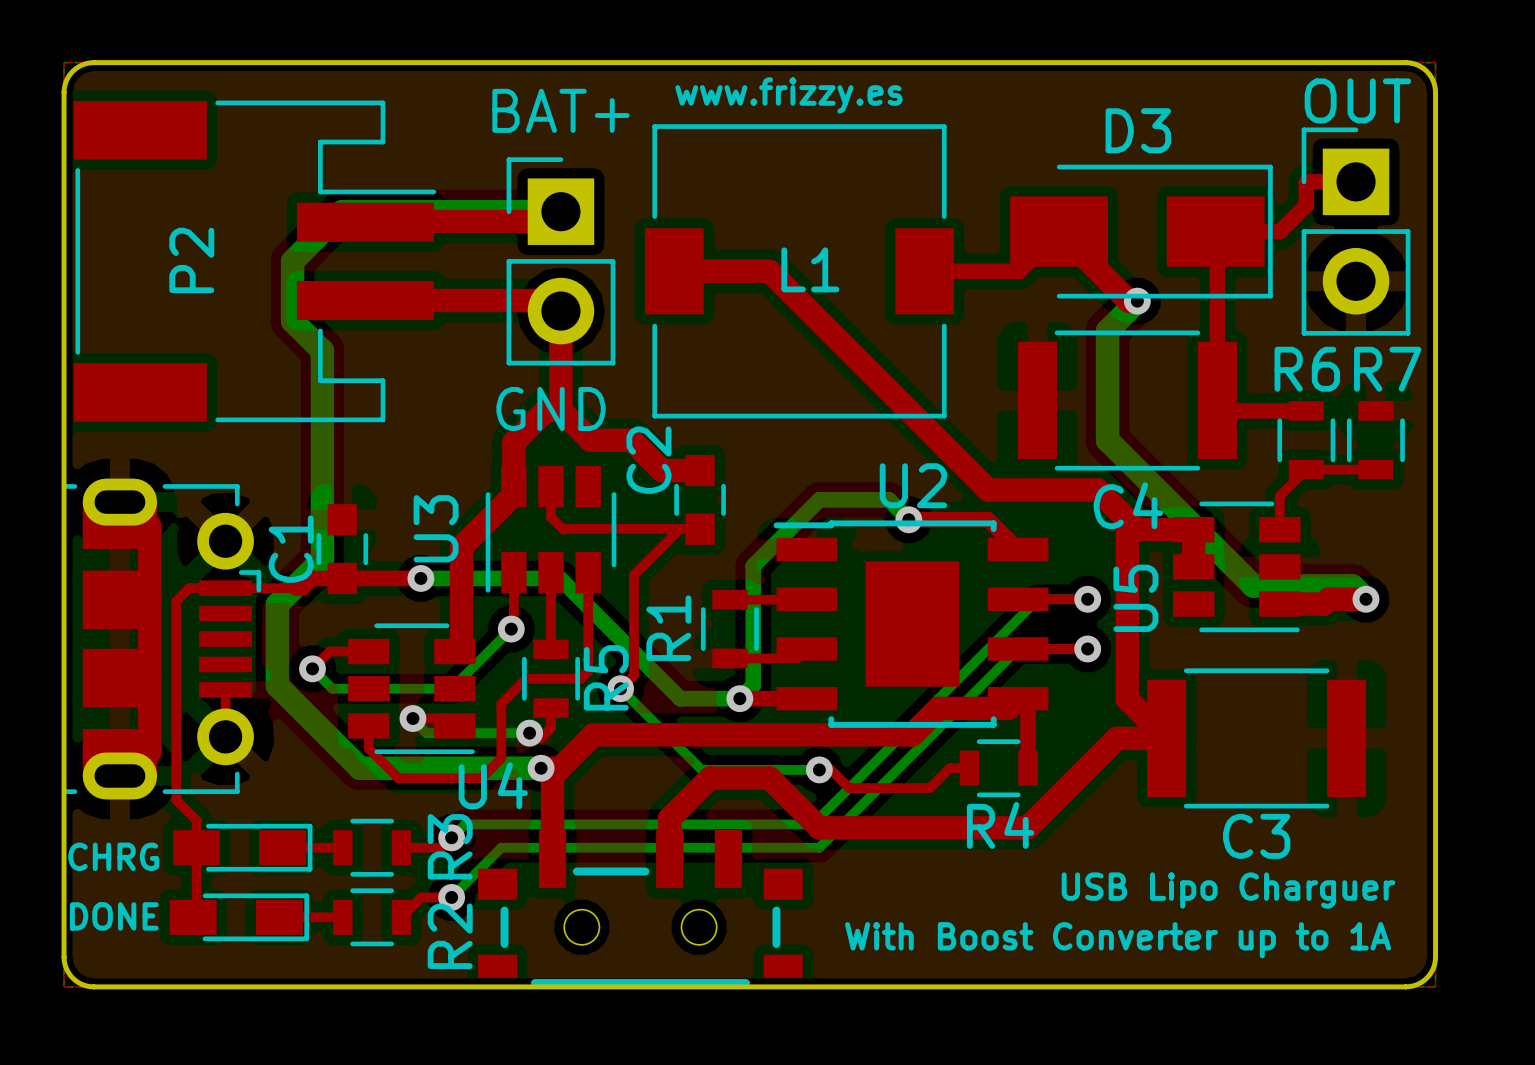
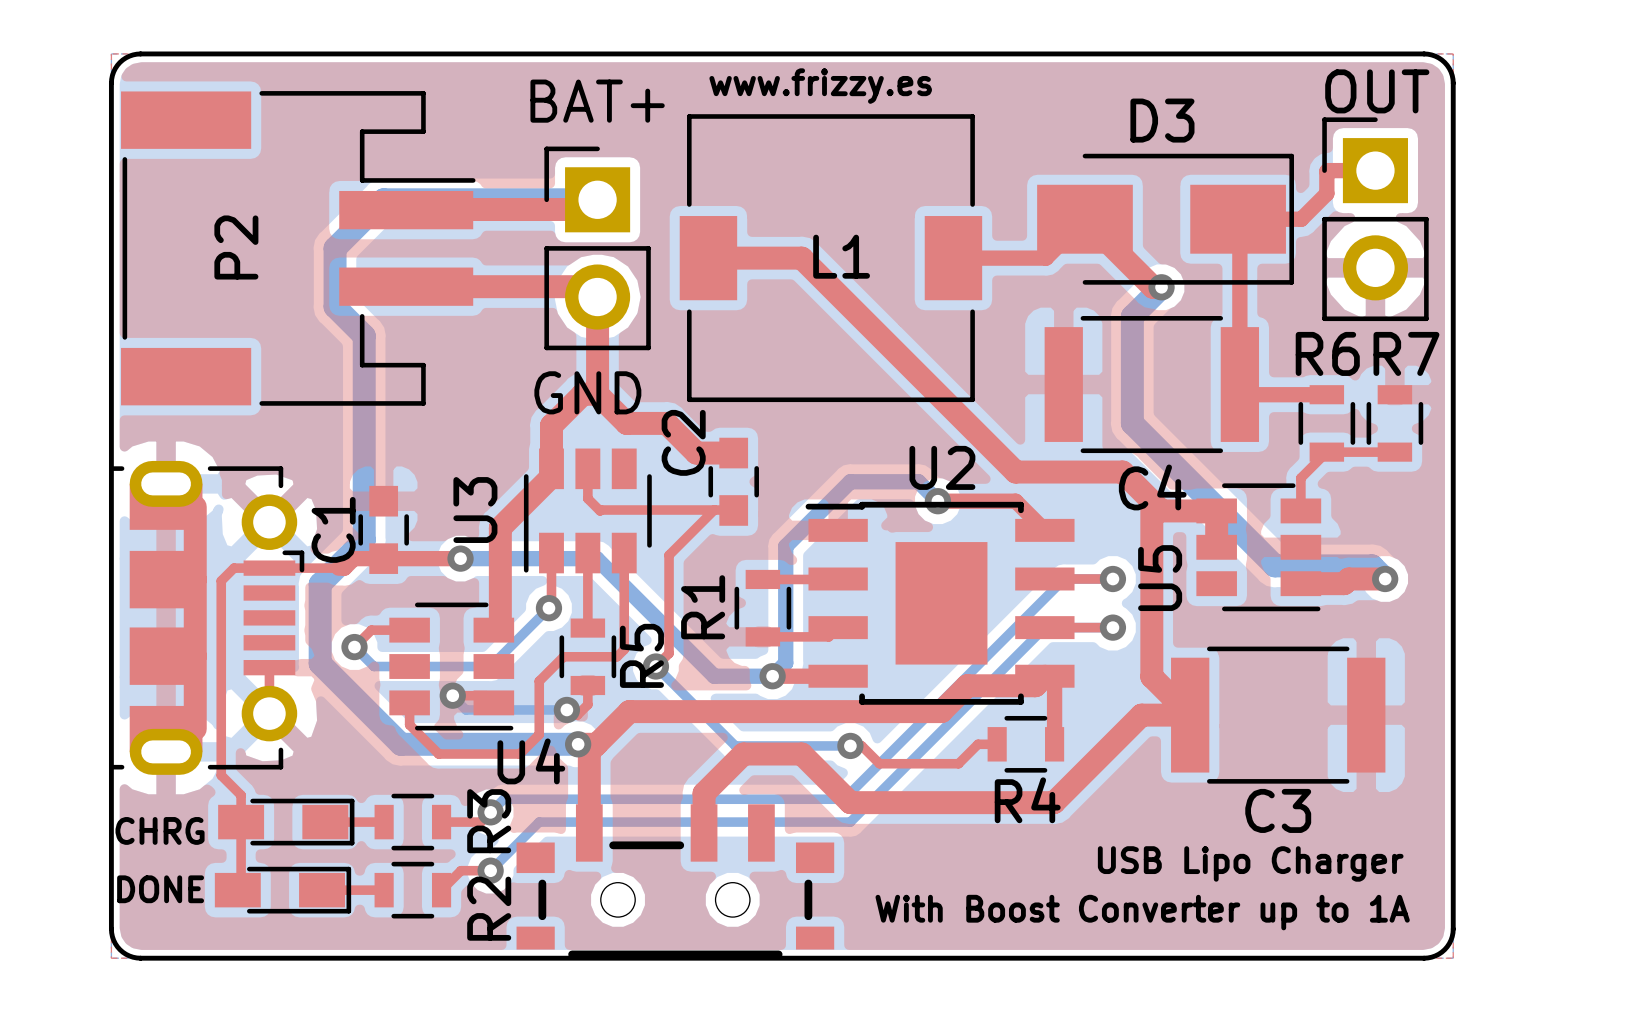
text: USB Lipo Charguer (1228, 890) -> USB Lipo Charger (1250, 863)

